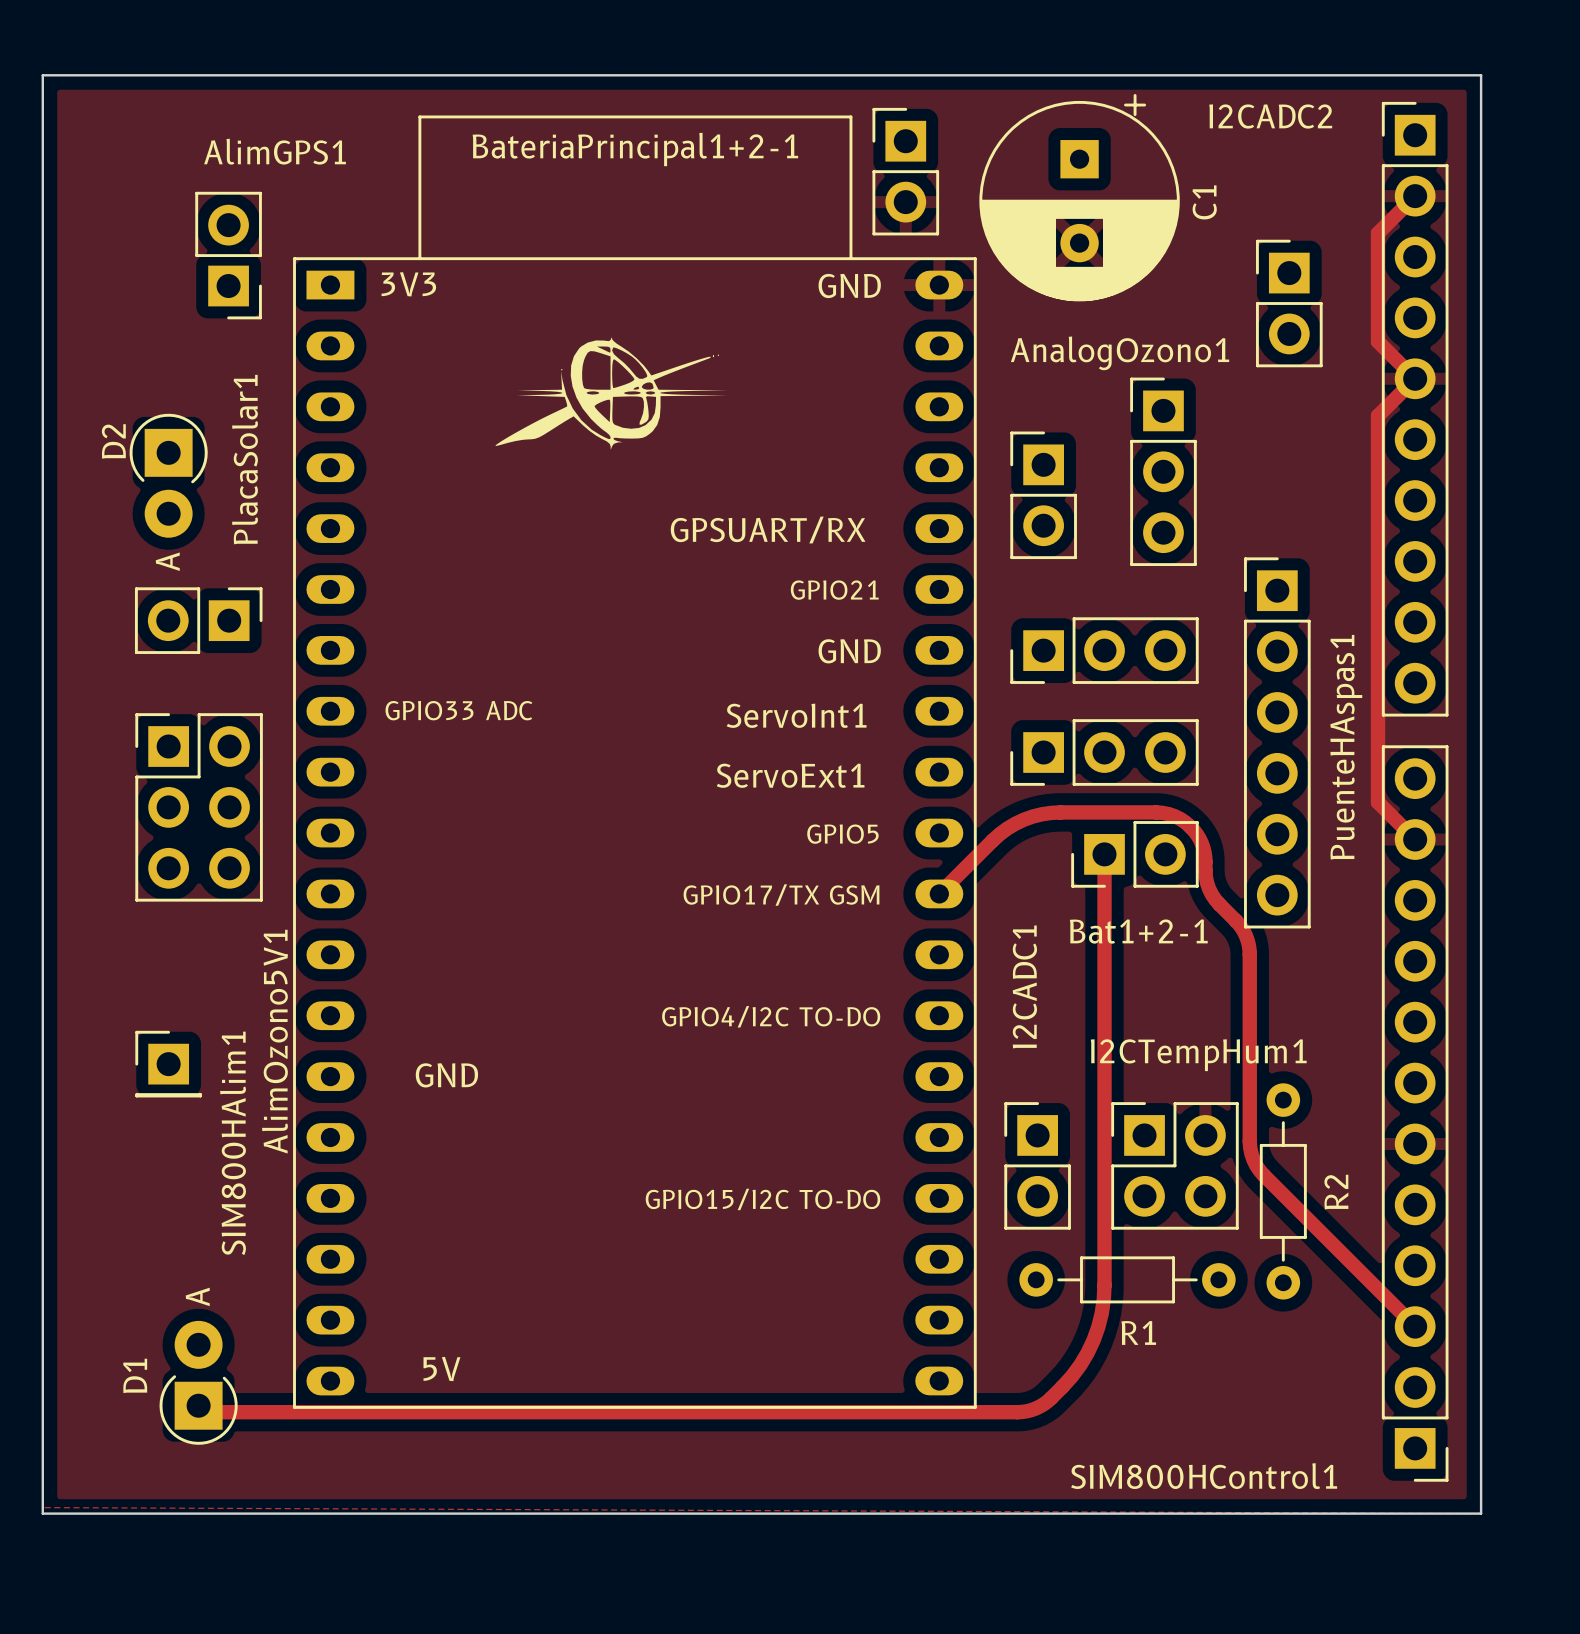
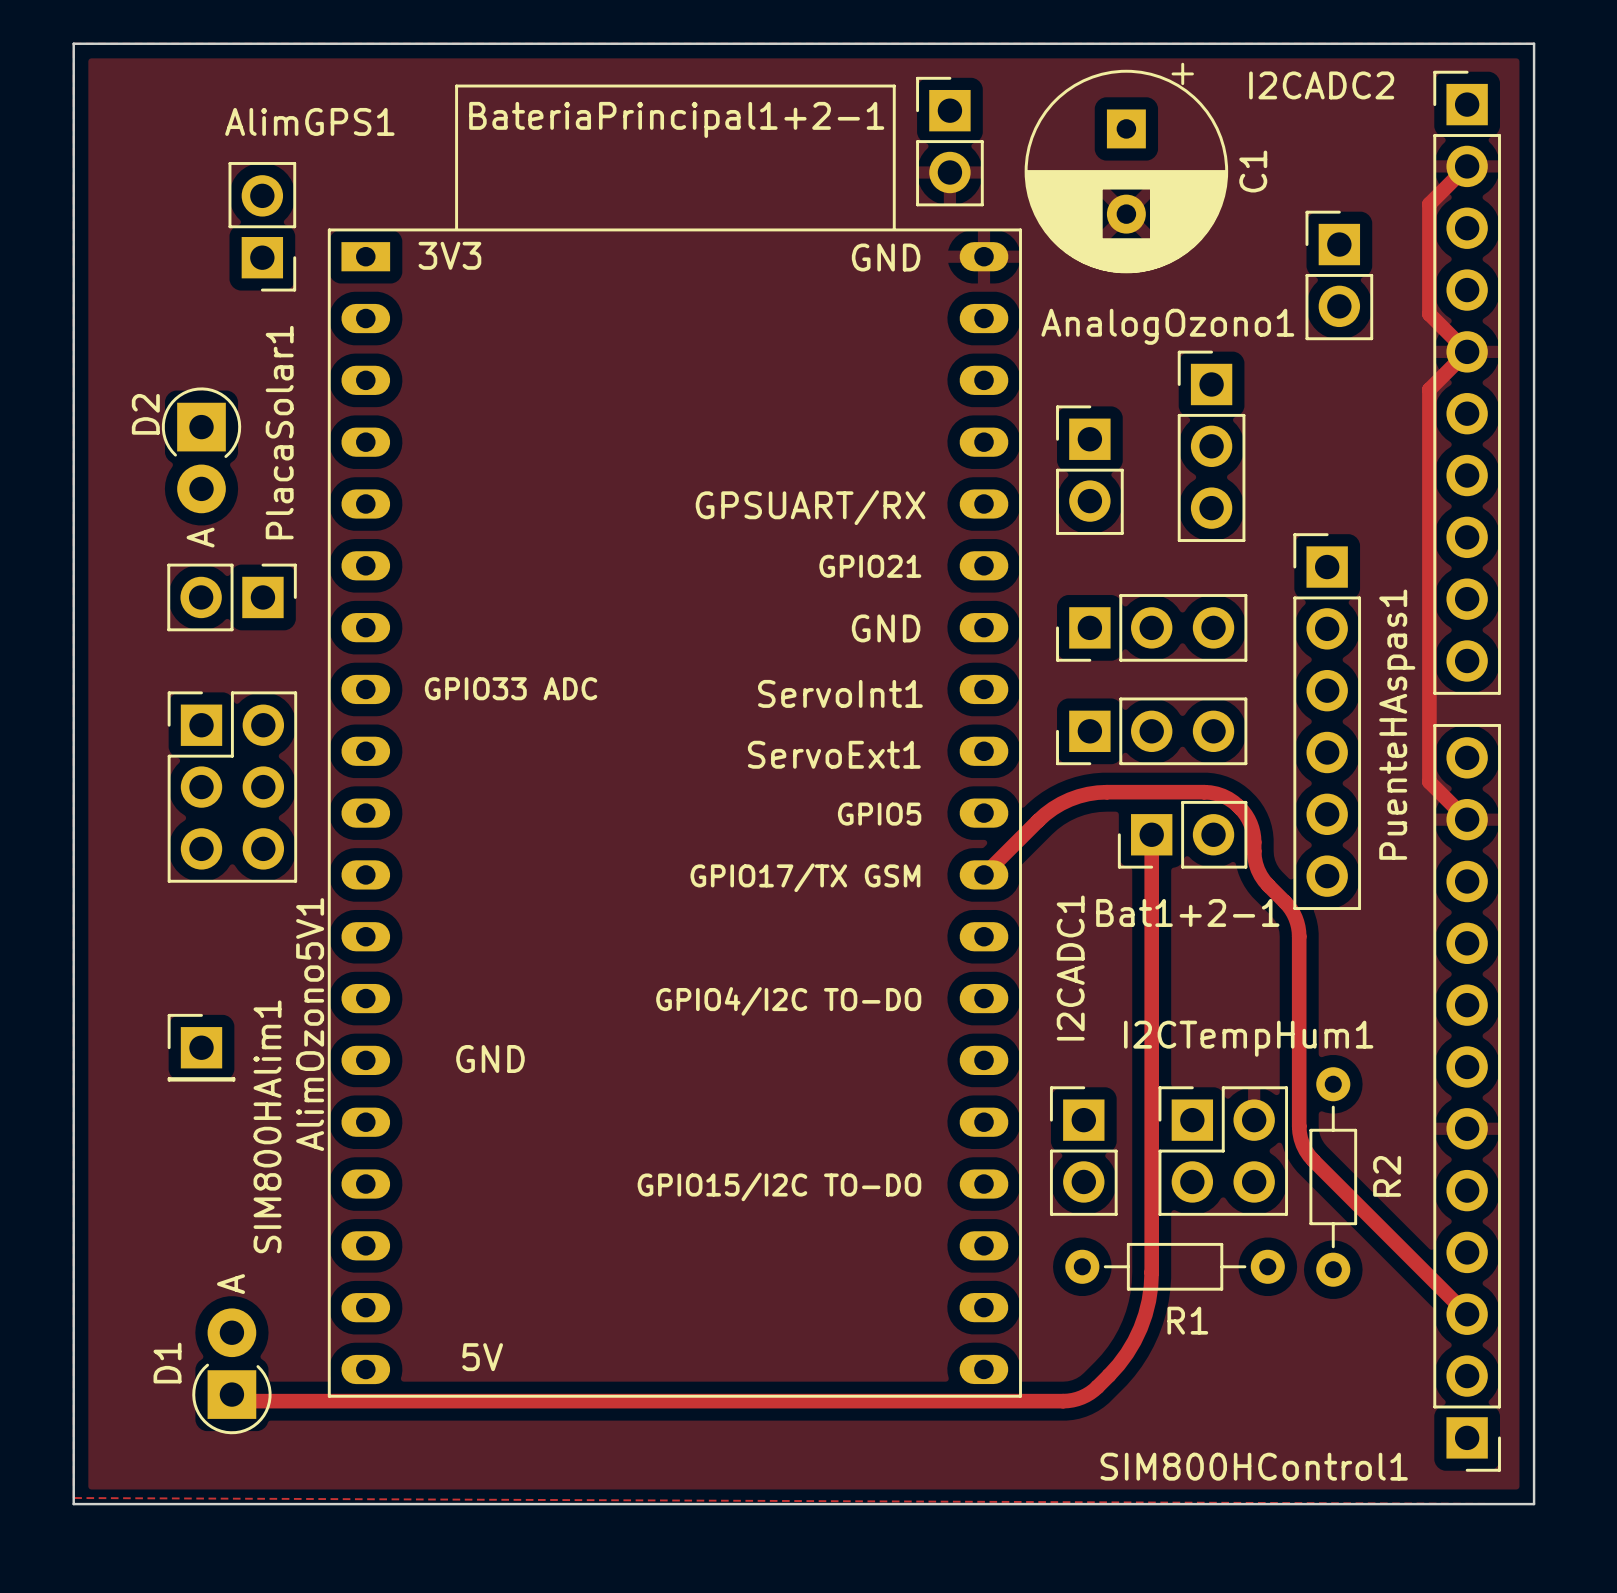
drawing: [495, 337, 728, 450] -> none

